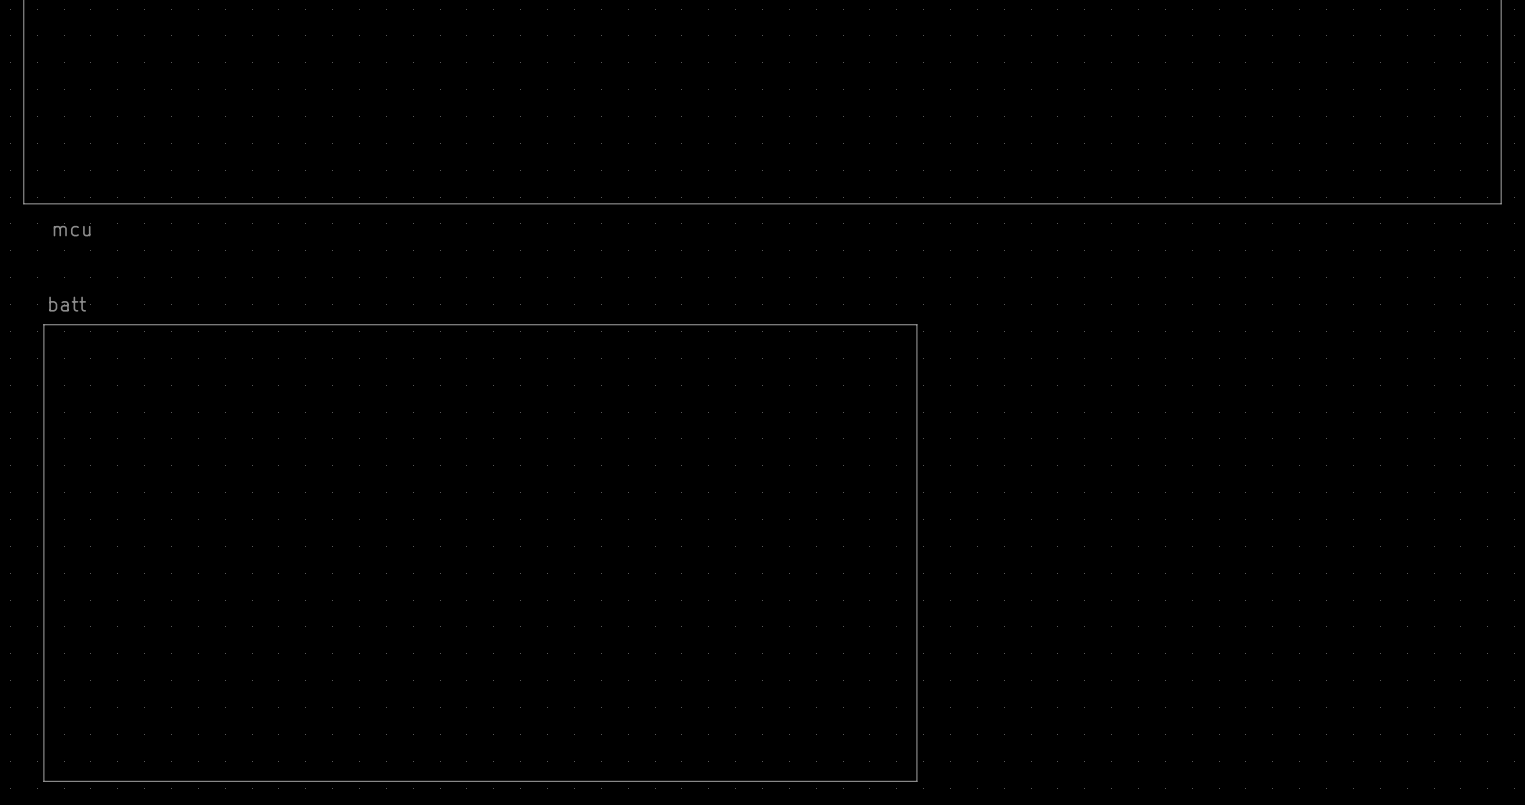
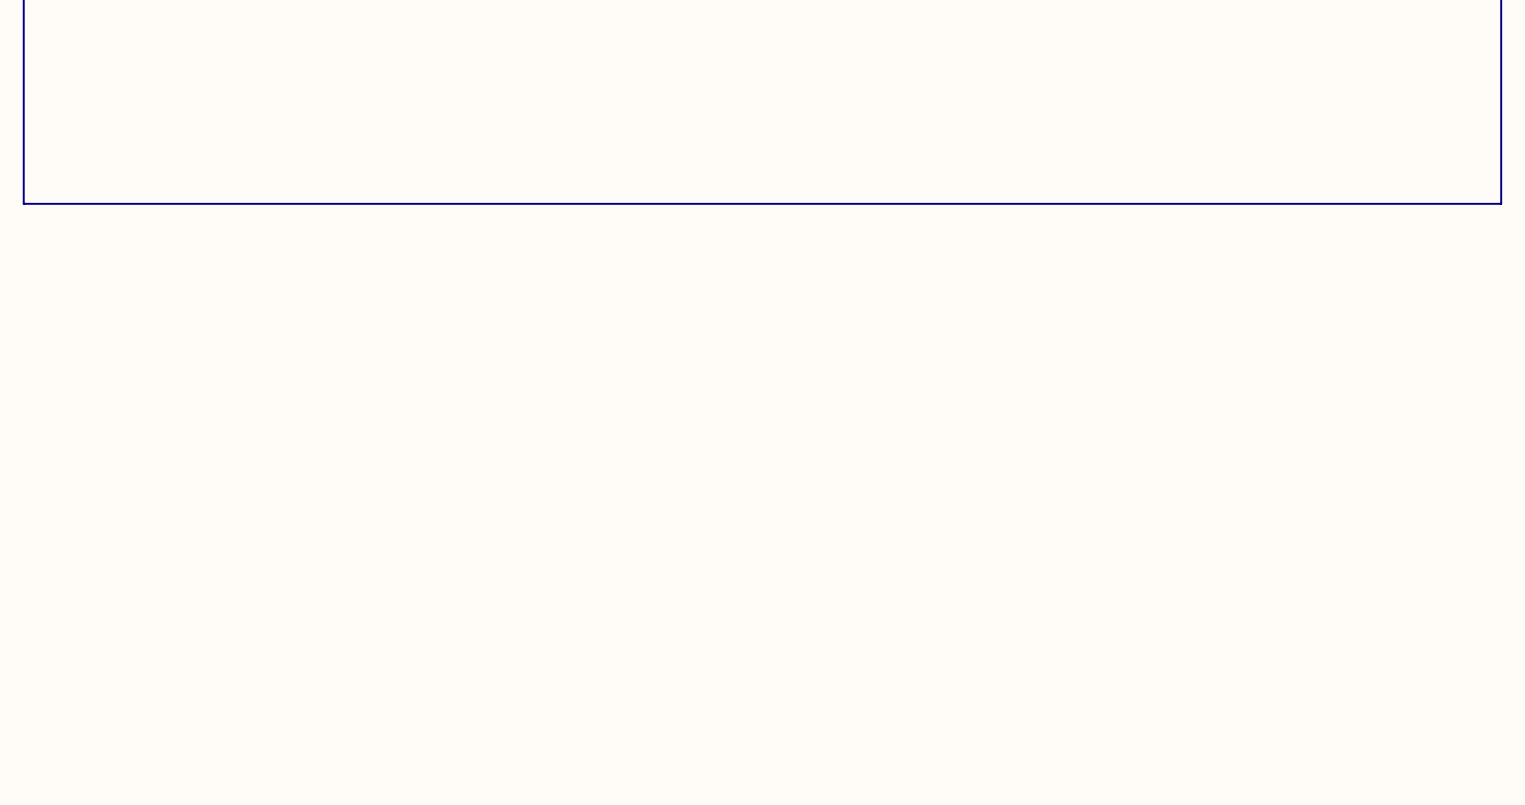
text: mcu (72, 231) -> none
text: batt (67, 304) -> none
line: (43, 324) (916, 324) (916, 781) (43, 781) (43, 324) -> none

